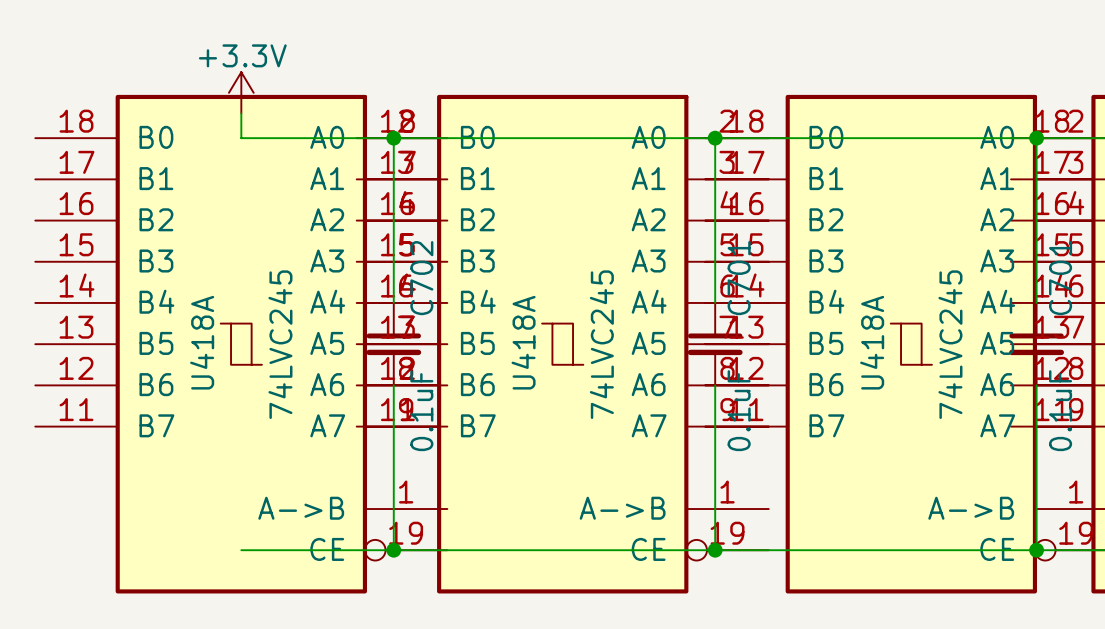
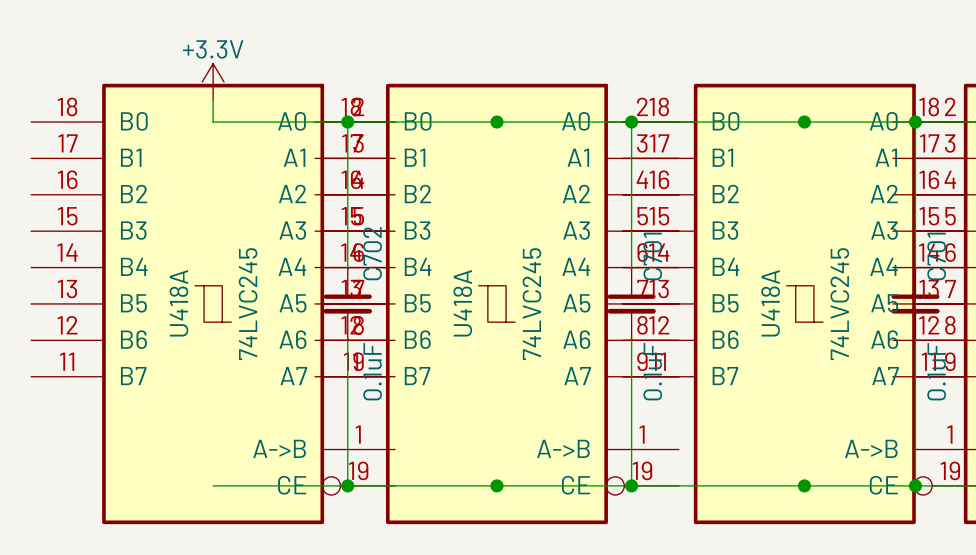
junction: none -> (496, 122)
junction: none -> (804, 122)
junction: none -> (496, 485)
junction: none -> (804, 485)

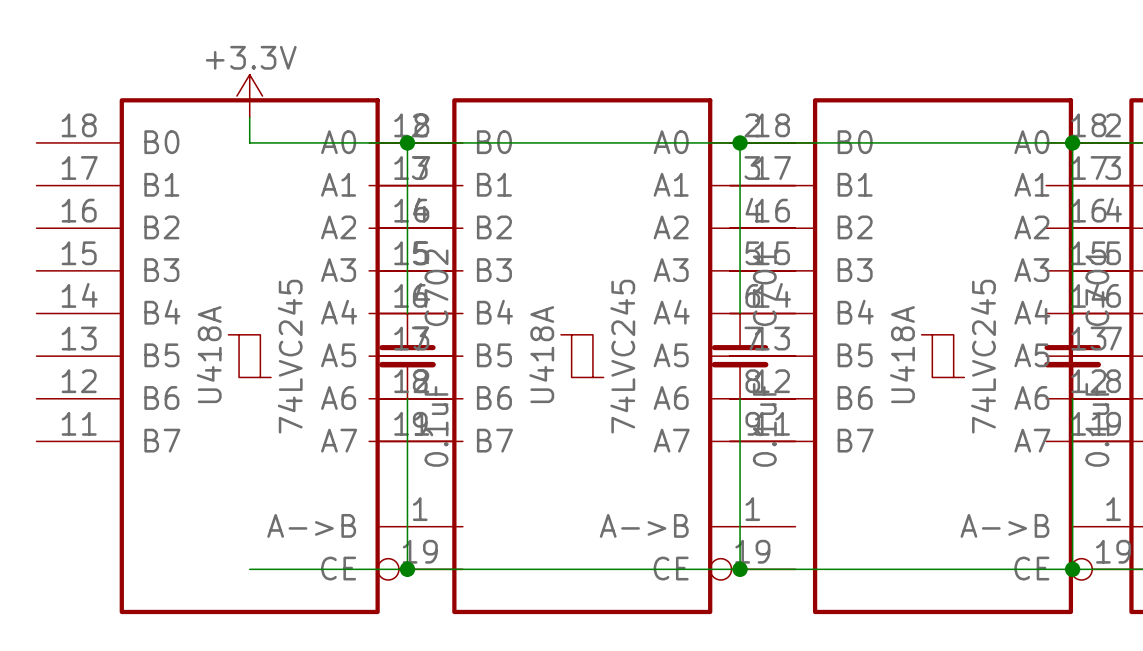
junction: (496, 122) -> none
junction: (804, 122) -> none
junction: (496, 485) -> none
junction: (804, 485) -> none

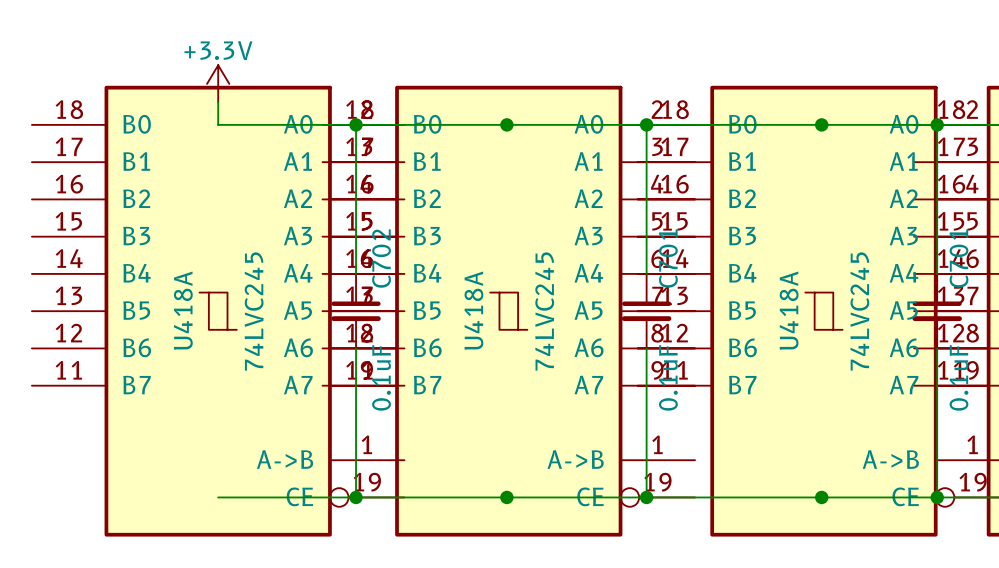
junction: none -> (506, 124)
junction: none -> (821, 124)
junction: none -> (506, 497)
junction: none -> (821, 497)

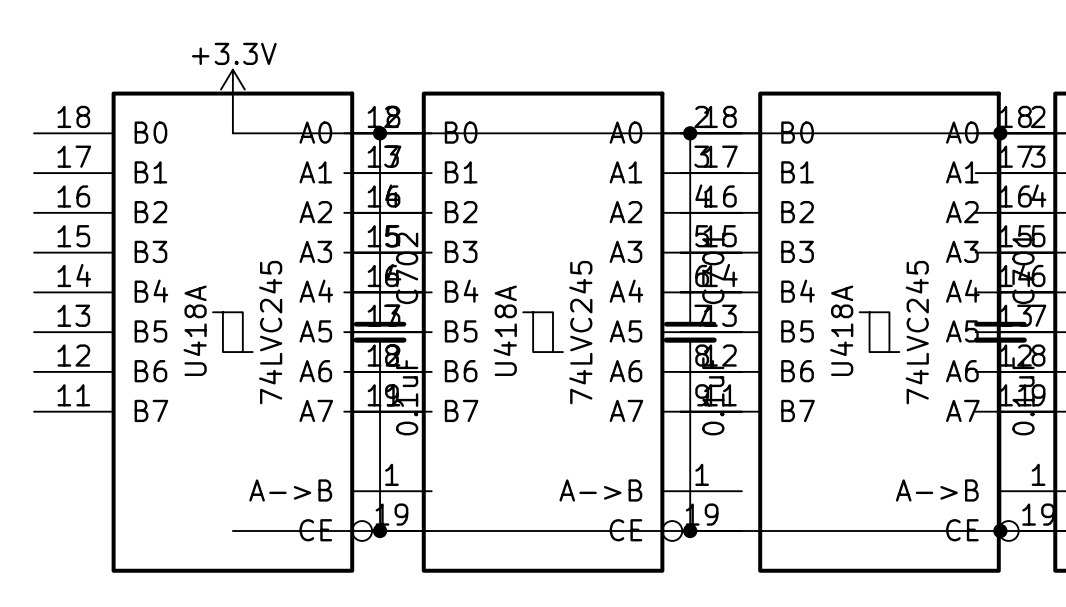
junction: (506, 124) -> none
junction: (821, 124) -> none
junction: (506, 497) -> none
junction: (821, 497) -> none

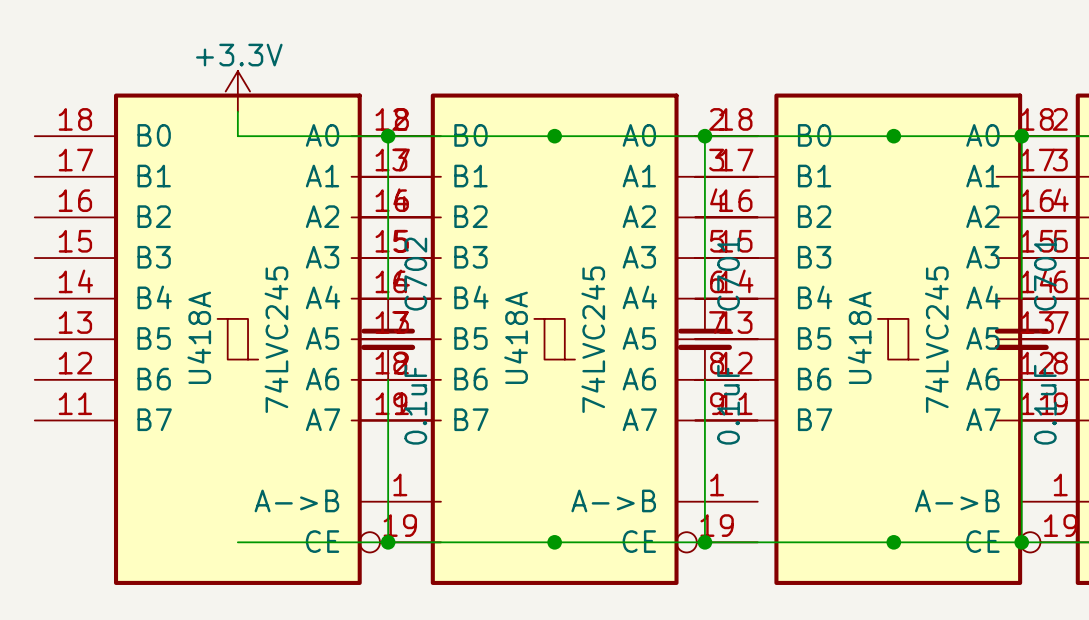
junction: none -> (554, 136)
junction: none -> (893, 136)
junction: none -> (554, 542)
junction: none -> (893, 542)

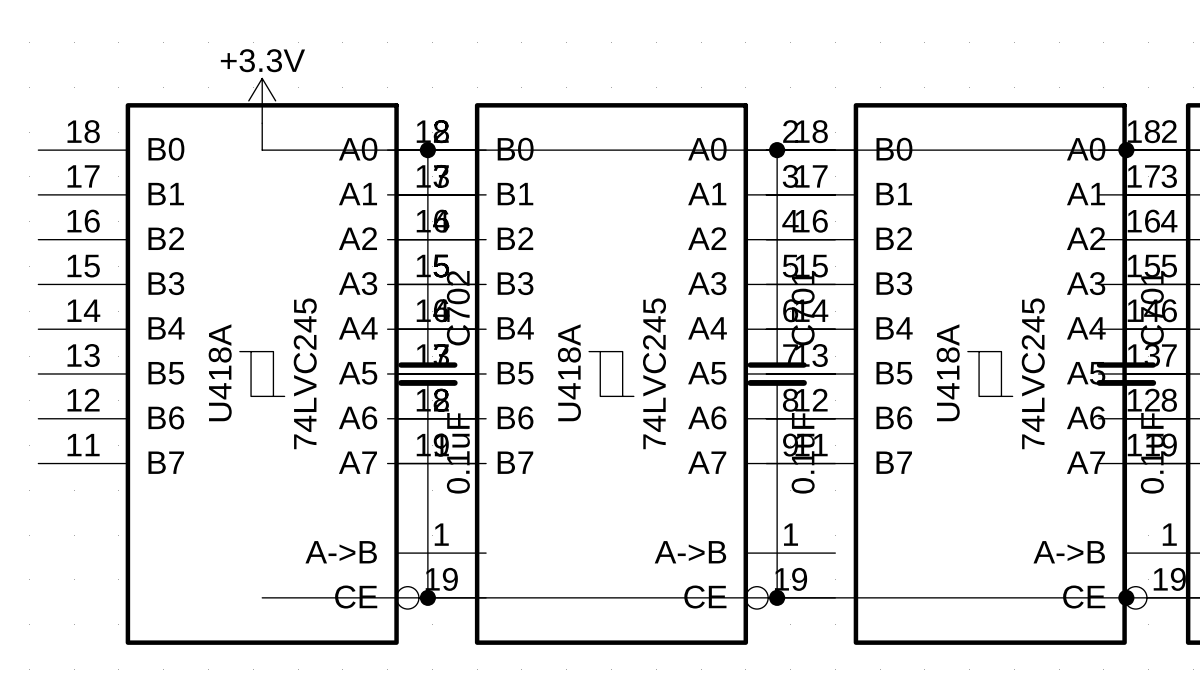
junction: (554, 136) -> none
junction: (893, 136) -> none
junction: (554, 542) -> none
junction: (893, 542) -> none

